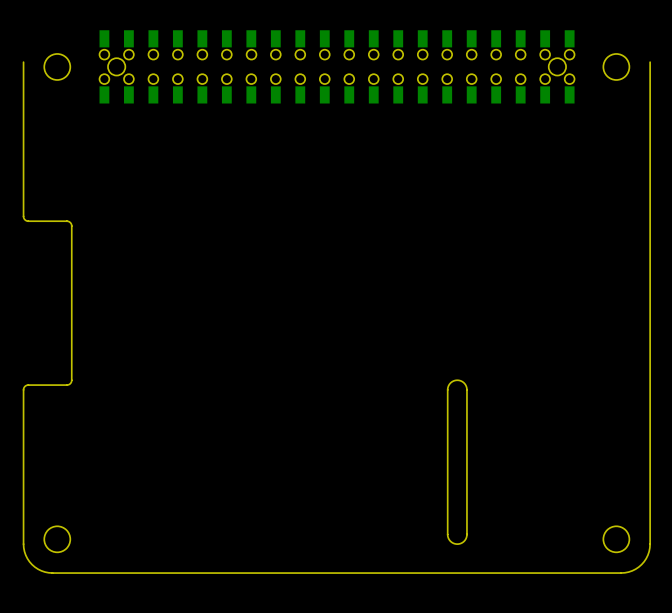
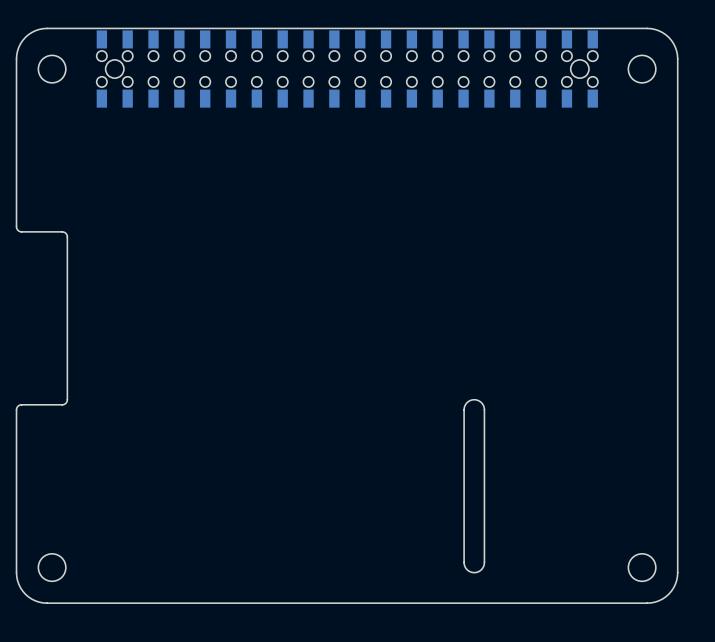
board edge: none -> (16, 64) (17, 51) (22, 40) (31, 32) (47, 28) (647, 28) (662, 32) (671, 40) (676, 51) (677, 64)

